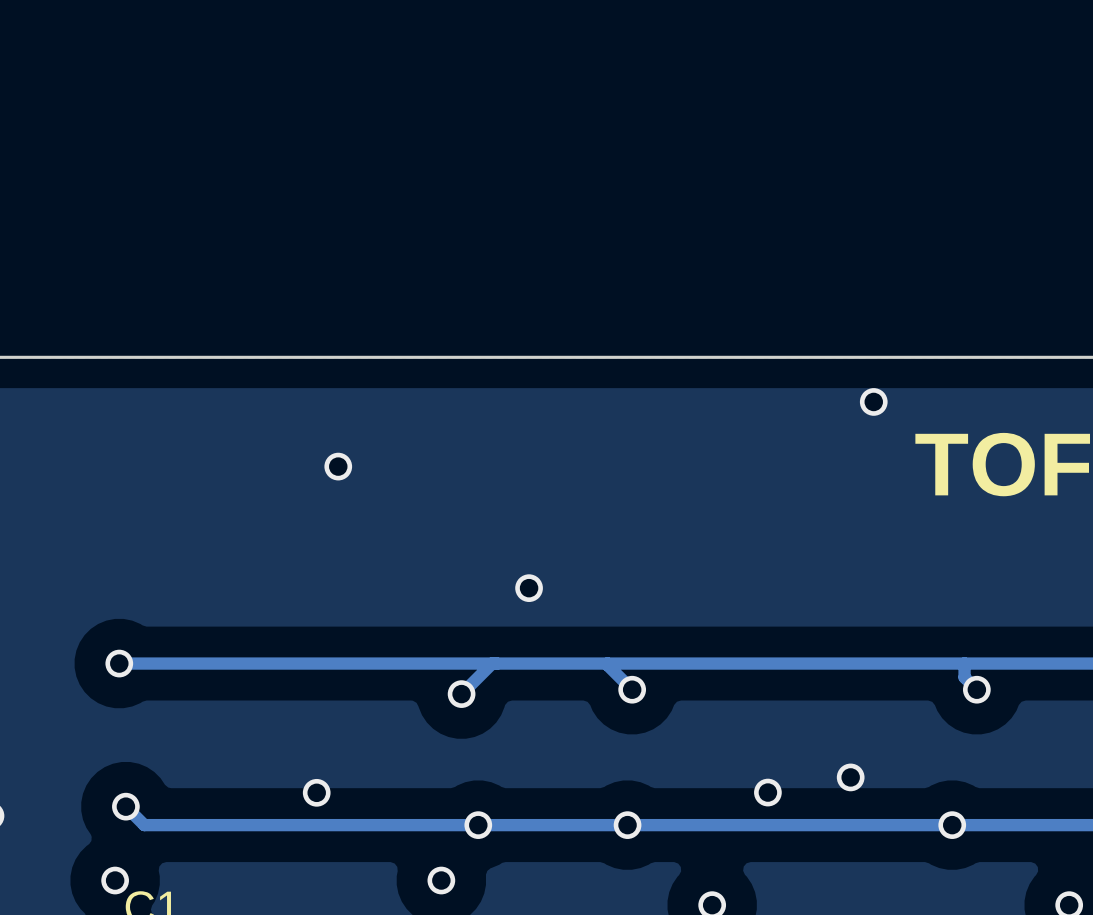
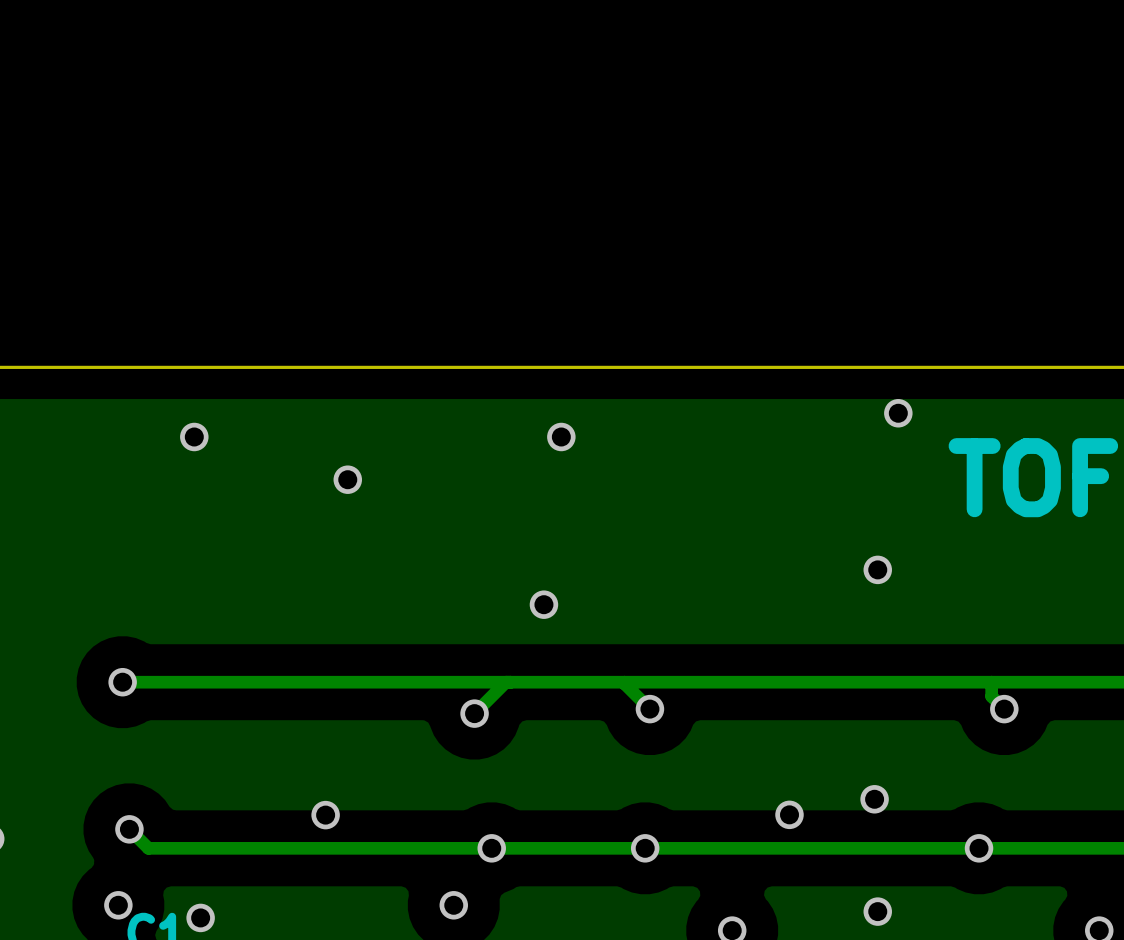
via: none -> (194, 436)
via: none -> (561, 436)
via: none -> (877, 569)
via: none -> (877, 911)
via: none -> (200, 917)

